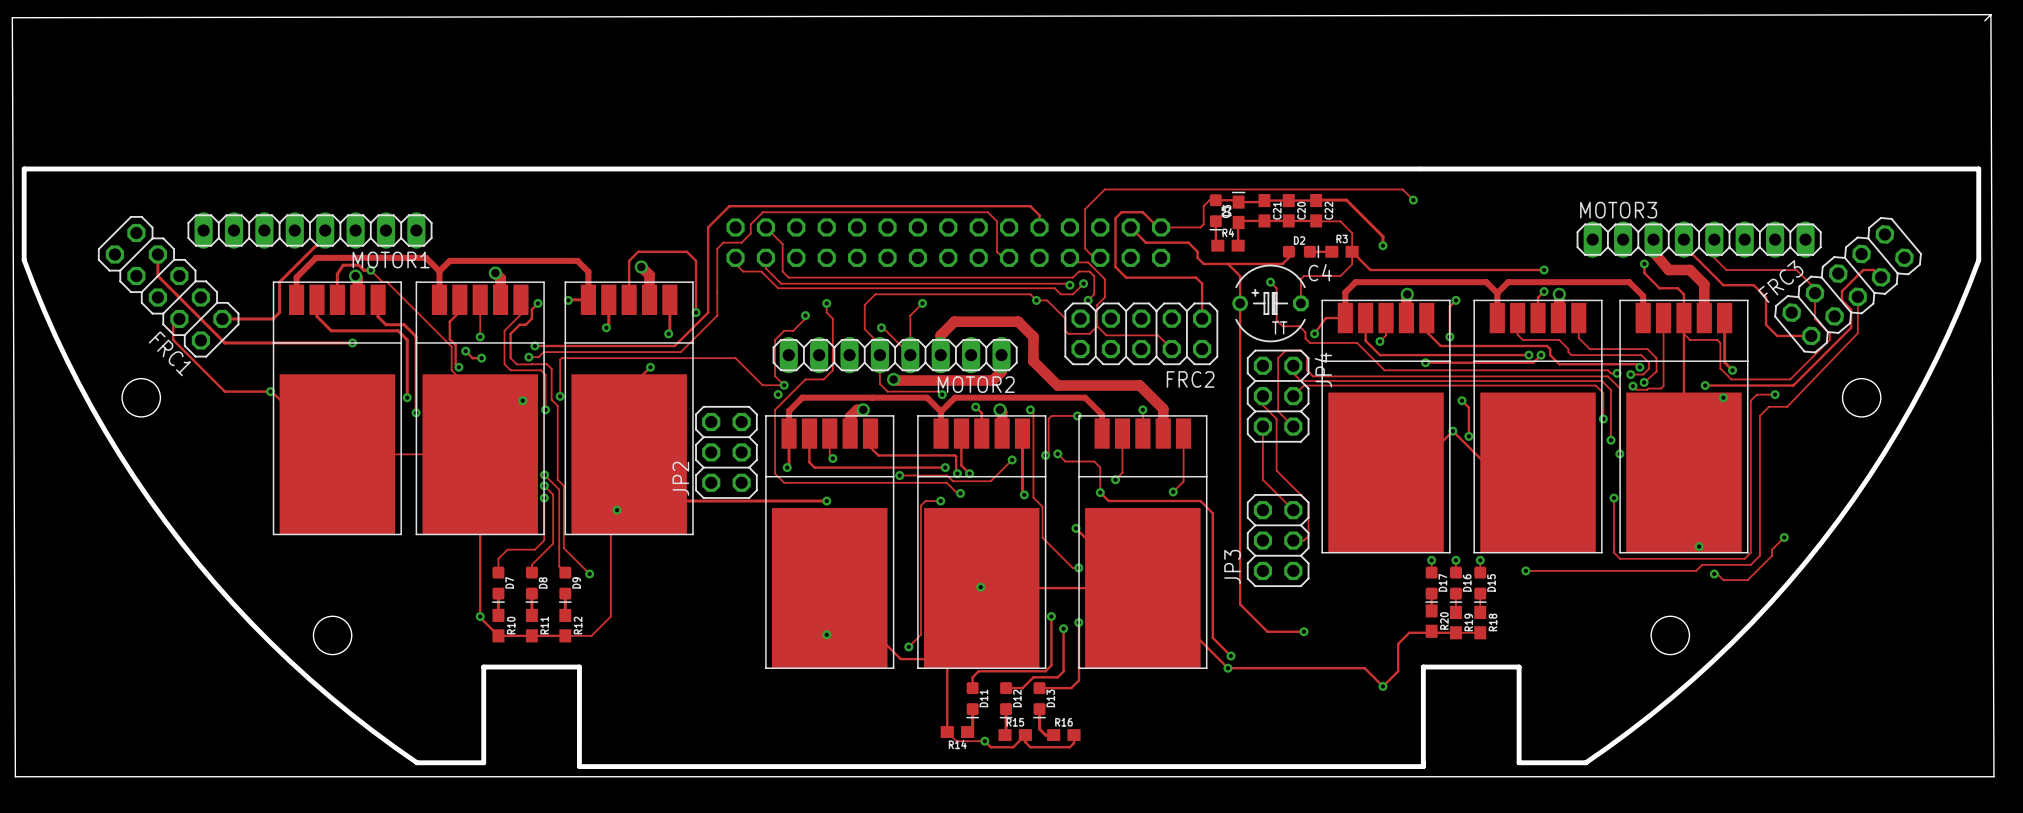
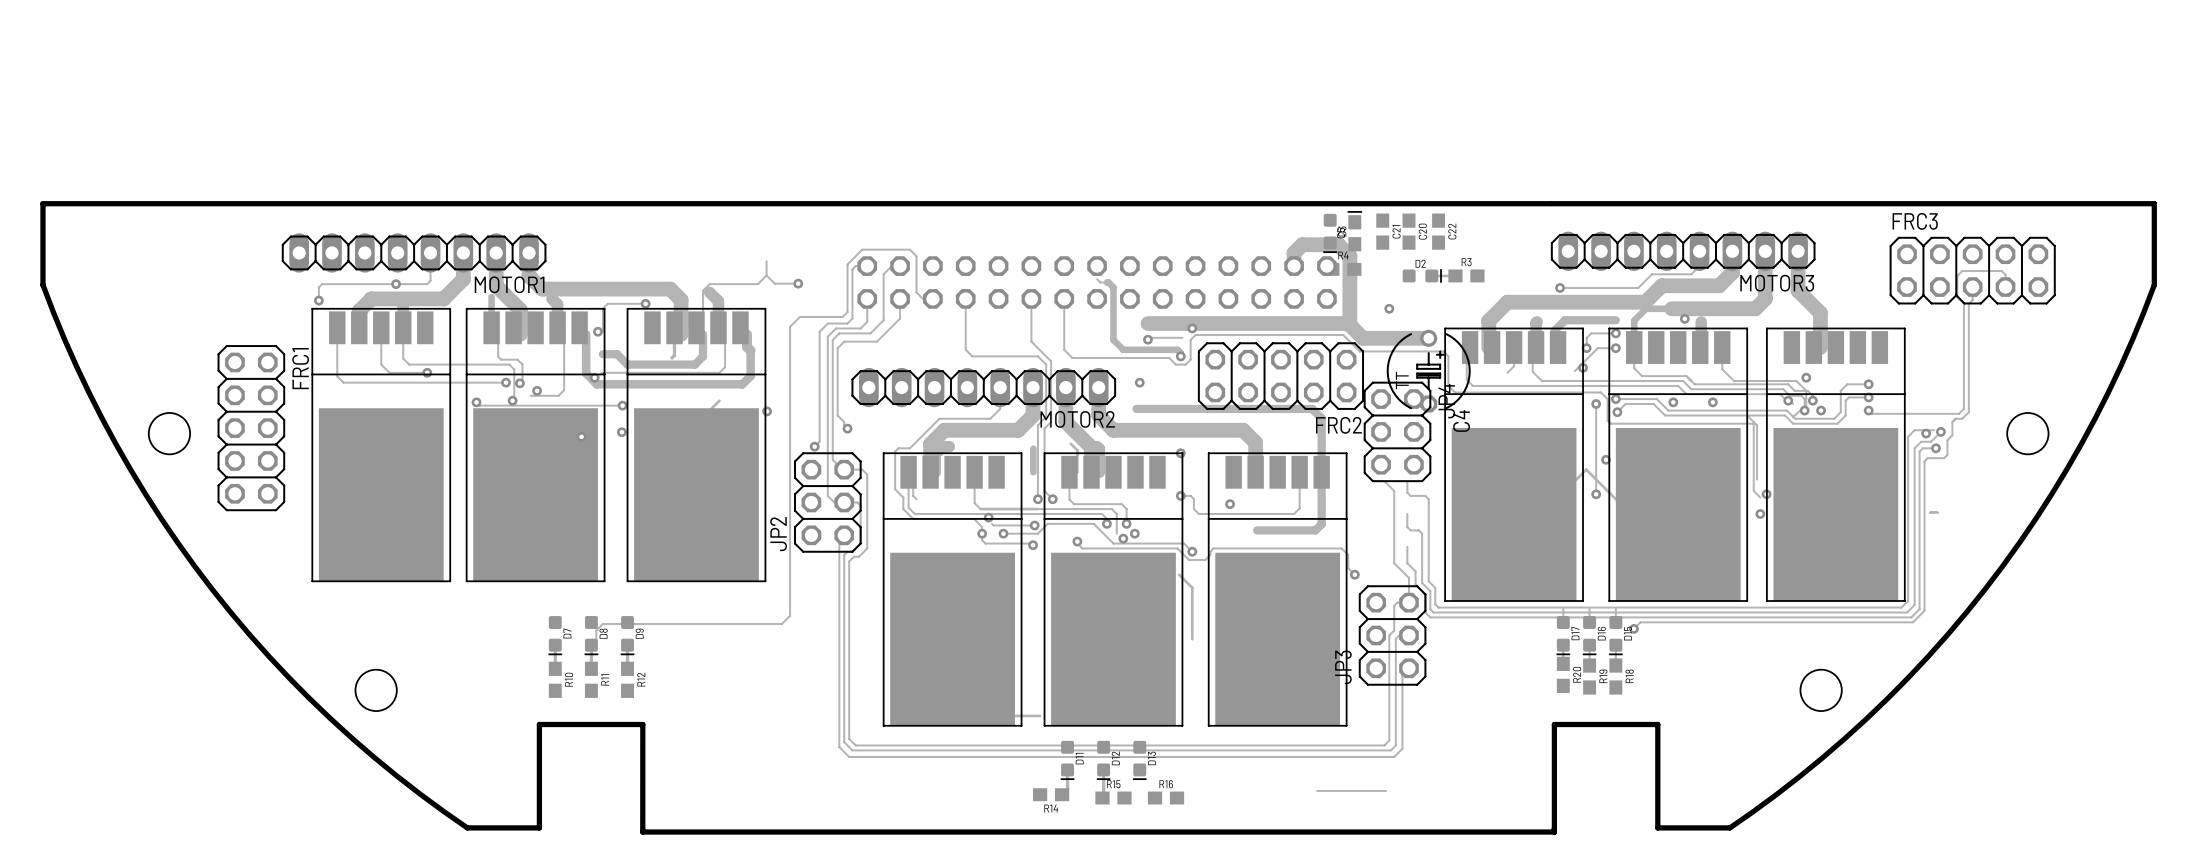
board edge: (1990, 14) (12, 17) (15, 776) (1993, 776) (1990, 14) -> none
board edge: (1990, 14) (1984, 20) -> none
board edge: (1419, 168) (24, 168) (24, 184) -> (1550, 203) (42, 203)
board edge: (1420, 168) (1978, 168) (1978, 184) -> (1551, 203) (2154, 203)
track: (1413, 200) (1402, 189) (1104, 189) (1085, 209) (1085, 248) (1094, 257) (1100, 257) -> none
via: (1413, 200) -> none
MOTOR3 name position: MOTOR3 (1618, 210) -> MOTOR3 (1777, 283)
track: (1215, 221) (1215, 243) (1217, 245) -> none
track: (765, 227) (782, 244) (782, 271) (788, 277) (1072, 277) (1079, 271) (1089, 271) (1094, 276) (1094, 294) (1088, 300) -> none
track: (1039, 227) (1039, 215) (1030, 206) (729, 206) (708, 227) (708, 312) (674, 346) (534, 346) -> none
track: (1130, 227) (1145, 242) (1188, 242) (1197, 251) (1197, 257) (1203, 263) (1282, 263) (1288, 257) (1288, 251) -> none
track: none -> (1699, 251) (1699, 266) (1691, 274) (1651, 274) (1638, 287) (1560, 287)
track: none -> (1732, 251) (1732, 272) (1719, 285) (1661, 285) (1645, 302) (1507, 302) (1488, 320) (1488, 347)
track: none -> (1798, 251) (1798, 290) (1820, 313) (1820, 347)
MOTOR1 position: (309, 230) -> (414, 252)
track: (325, 230) (325, 236) (279, 282) (279, 312) (273, 318) (222, 318) -> none
track: none -> (430, 252) (430, 280) (427, 284) (322, 284) (318, 287) (318, 300)
track: none -> (463, 252) (463, 279) (443, 298) (371, 298) (359, 311) (359, 327)
track: none -> (496, 252) (496, 285) (520, 309) (520, 334)
track: none -> (529, 252) (529, 275) (542, 289) (670, 289) (681, 299) (681, 334)
track: none -> (766, 261) (766, 275)
track: (1653, 239) (1653, 251) (1668, 270) (1690, 270) (1704, 284) (1704, 318) -> none
track: (1683, 239) (1683, 245) (1723, 285) (1753, 285) (1765, 297) (1765, 324) (1777, 335) (1811, 335) -> none
MOTOR3 position: (1699, 239) -> (1683, 251)
track: (1714, 239) (1714, 257) (1726, 270) (1796, 270) (1815, 288) (1815, 319) (1829, 333) (1829, 339) (1790, 379) -> (2005, 287) (2005, 274) (2001, 271) (1962, 271) (1957, 275) (1957, 297) (1963, 303) (1963, 408) (1958, 413) (1950, 413)
track: none -> (867, 266) (855, 266) (852, 269) (852, 318) (847, 323) (827, 323) (819, 331) (819, 441) (814, 446)
track: none -> (900, 266) (891, 266) (883, 274) (883, 320) (870, 333) (839, 333) (832, 339) (832, 459) (842, 469) (862, 469) (867, 474) (867, 548) (859, 556) (854, 556) (849, 561) (849, 738) (855, 745) (1384, 745) (1389, 740) (1389, 635) (1394, 630) (1394, 605) (1397, 602) (1409, 602) (1409, 578) (1394, 563) (1394, 491) (1384, 481) (1374, 481)
part position: (948, 242) -> (1097, 282)
track: none -> (1294, 266) (1294, 252) (1302, 244) (1338, 244) (1349, 256) (1349, 325)
track: (1238, 245) (1238, 222) (1240, 220) (1340, 221) (1352, 233) (1352, 264) (1340, 276) (1303, 276) (1300, 279) (1300, 303) -> none
track: (1382, 245) (1382, 236) (1346, 200) (1262, 202) (1209, 200) (1203, 206) (1203, 224) (1200, 227) (1158, 227) (1142, 212) (1121, 212) (1115, 218) (1115, 266) (1126, 277) (1196, 277) (1202, 283) (1202, 318) -> none
via: (1382, 245) -> none
track: none -> (766, 275) (774, 283) (798, 283)
track: none -> (766, 275) (757, 284) (709, 284) (703, 290) (703, 356) (694, 364) (627, 364) (617, 354) (602, 354)
track: (1352, 251) (1370, 270) (1544, 270) -> none
track: (157, 254) (157, 275) (224, 342) (352, 342) -> none
track: (1000, 254) (996, 251) (996, 221) (987, 212) (762, 212) (750, 224) (750, 233) (741, 242) (723, 242) (717, 248) (717, 315) (680, 352) (671, 352) -> (747, 334) (747, 347) (750, 350) (750, 376) (742, 384)
track: (735, 257) (735, 263) (743, 271) (761, 271) (778, 288) (1054, 288) (1060, 294) (1072, 294) (1083, 283) -> none
track: (765, 257) (765, 268) (781, 283) (1068, 283) (1069, 285) -> none
track: none -> (1106, 282) (1113, 287) (1113, 339) (1123, 349) (1177, 349) (1180, 356)
track: (1069, 257) (1074, 262) (1088, 262) (1104, 279) (1104, 297) (1097, 304) (1097, 326) -> none
via: none -> (798, 283)
via: none -> (1560, 287)
track: (1227, 263) (1240, 276) (1240, 604) (1267, 631) (1303, 631) -> none
track: (1644, 263) (1644, 273) (1659, 288) (1677, 288) (1683, 294) (1683, 449) (1695, 460) -> none
via: (1644, 263) -> none
C4 footprint: [1232, 264, 1309, 343] -> [1386, 329, 1471, 413]
via: (641, 266) -> none
via position: (370, 270) -> (396, 284)
via: (1544, 270) -> none
C4 name position: C4 (1320, 272) -> C4 (1461, 421)
via: (495, 273) -> none
track: none -> (867, 298) (867, 321) (860, 328) (836, 328) (827, 336) (827, 495) (834, 502) (857, 502) (860, 505) (860, 543) (852, 551) (847, 551) (844, 555) (844, 742) (852, 750) (1390, 750) (1395, 745) (1395, 638) (1399, 635) (1409, 635)
track: none -> (900, 298) (900, 318) (877, 341) (844, 341) (837, 348) (837, 415) (847, 428)
track: none -> (932, 298) (923, 298) (916, 292) (916, 256) (909, 249) (862, 249) (847, 264) (847, 312) (842, 316) (799, 316) (790, 326) (790, 615) (781, 623) (602, 623) (596, 630) (596, 646)
track: none -> (965, 298) (965, 349) (972, 356) (1037, 356) (1046, 364) (1046, 416) (1037, 425) (1037, 499)
track: none -> (1031, 298) (1031, 341) (1051, 361) (1051, 422) (1044, 428) (1044, 491) (1052, 499)
via: none -> (318, 300)
via: (355, 276) -> none
track: none -> (645, 303) (607, 303) (602, 308) (602, 332)
track: (1881, 277) (1873, 270) (1863, 270) (1841, 291) (1841, 300) (1851, 309) (1851, 327) (1794, 384) -> (1972, 287) (1972, 299) (1968, 303) (1968, 412) (1962, 418) (1955, 418)
track: (1270, 282) (1276, 288) (1276, 320) (1282, 326) (1299, 326) (1305, 332) (1305, 338) (1310, 342) (1357, 342) (1384, 370) (1489, 370) -> (1617, 412) (1625, 403)
track width: thin (1531, 282) (1609, 282) -> thick (1671, 308) (1755, 308)
track: (1609, 282) (1629, 282) (1643, 296) (1643, 318) -> (1755, 308) (1765, 298) (1765, 251)
via: (1083, 283) -> none
via: (1069, 285) -> none
FRC3 rotation: 0° (1848, 285) -> 40° clockwise (1972, 270)
FRC1 rotation: 0° (168, 286) -> 45° clockwise (251, 428)
FRC1 position: (168, 286) -> (251, 428)
track: (1544, 291) (1538, 297) (1538, 306) -> none
track: none -> (1615, 320) (1564, 320) (1554, 330) (1554, 347)
track: (1497, 293) (1486, 282) (1355, 282) (1345, 292) (1345, 318) (1325, 318) (1314, 333) -> none
via: (1407, 294) -> none
via: (1559, 294) -> none
track: none -> (1147, 323) (1348, 323) (1363, 338) (1428, 338)
track: (1857, 296) (1857, 333) (1787, 406) (1769, 406) (1764, 411) -> (1935, 448) (1922, 448)
track: (296, 299) (296, 277) (316, 257) (426, 257) (439, 271) (449, 260) (577, 260) (588, 271) (588, 299) (568, 300) -> none
track: (337, 299) (337, 274) (343, 265) (358, 265) (363, 270) (370, 270) (382, 281) (386, 281) (451, 346) (451, 370) (460, 379) (480, 379) (480, 448) (486, 454) -> none
track: (459, 299) (458, 312) (449, 321) (449, 339) (455, 345) (455, 363) (458, 367) -> none
track: (480, 299) (480, 336) -> none
track: (520, 299) (520, 314) (504, 330) (504, 364) (510, 370) (541, 370) (545, 374) (545, 409) -> none
track: (629, 299) (629, 260) (638, 251) (686, 251) (696, 260) (696, 312) -> none
track: (669, 299) (668, 333) -> none
via position: (568, 300) -> (645, 303)
via position: (1036, 300) -> (1147, 339)
track: (1455, 300) (1449, 306) (1449, 336) -> none
via: (1455, 300) -> none
track: (537, 303) (531, 309) (531, 318) (525, 324) (519, 324) (510, 333) (510, 358) (516, 364) (531, 364) -> none
track: (826, 303) (826, 312) (832, 318) (832, 370) (823, 379) (805, 379) (775, 409) (775, 473) (784, 482) (904, 482) -> (992, 523) (993, 525)
via: (826, 303) -> none
track: (922, 303) (910, 315) (910, 355) (881, 327) -> none
via: (922, 303) -> none
track: none -> (1615, 333) (1591, 333) (1586, 337) (1586, 348)
via: none -> (1615, 333)
track: none -> (337, 334) (337, 376) (343, 382) (506, 382)
track: (316, 305) (316, 316) (331, 330) (398, 330) (407, 339) (407, 397) -> none
track: none -> (381, 334) (381, 364) (389, 372) (427, 372)
track: none -> (403, 334) (403, 358) (409, 364) (509, 364) (514, 369) (514, 395)
track: (378, 305) (378, 316) (385, 324) (404, 324) (416, 336) (416, 412) -> none
track: none -> (498, 334) (498, 356) (501, 359) (517, 359) (522, 364) (522, 382)
track: none -> (564, 334) (564, 390) (558, 395) (530, 395)
track: none -> (725, 334) (725, 367) (719, 372) (601, 372)
track: none -> (1182, 337) (1149, 337) (1147, 339)
via: (696, 312) -> none
track: (805, 315) (805, 318) (793, 330) (784, 330) (775, 339) (775, 376) (784, 385) (762, 385) (735, 358) (561, 358) (560, 359) (560, 396) -> none
via: (805, 315) -> none
track: (179, 318) (173, 325) (173, 339) (224, 391) (271, 391) (337, 454) (489, 454) (480, 463) (480, 617) (498, 635) (591, 635) (610, 616) (610, 516) (617, 510) (617, 454) (629, 454) (675, 501) (826, 501) -> none
track: none -> (1466, 347) (1466, 379) (1473, 385) (1678, 385) (1686, 394) (1780, 394) (1793, 403)
track: (1365, 318) (1365, 340) (1379, 355) (1528, 355) -> none
track: none -> (1532, 347) (1532, 371) (1541, 381) (1683, 381) (1691, 389) (1783, 389) (1789, 395) (1801, 395) (1804, 399) (1804, 410)
track: (1426, 318) (1426, 332) (1440, 346) (1547, 346) -> (1634, 347) (1634, 368) (1642, 376) (1686, 376) (1688, 377)
via: none -> (1586, 348)
track: none -> (1615, 348) (1597, 348) (1574, 371)
via: none -> (1615, 348)
track: (1517, 318) (1517, 334) (1522, 339) (1559, 339) (1571, 355) (1641, 355) (1648, 362) (1648, 368) (1643, 374) (1630, 374) -> none
track: (1663, 318) (1663, 386) (1661, 388) -> (1868, 397) (1848, 397) (1845, 400) (1845, 415) (1837, 423) (1811, 423)
track: (1683, 318) (1683, 333) (1690, 339) (1717, 339) (1720, 342) (1720, 368) (1731, 379) -> (1868, 410) (1871, 413) (1887, 413)
track: (1724, 318) (1724, 362) (1732, 370) -> none
via: none -> (1180, 356)
track: (1097, 326) (1089, 333) (1082, 333) -> (1760, 497) (1753, 491) (1753, 423) (1610, 423) (1607, 420) (1607, 399) (1601, 392) (1454, 392) (1448, 385) (1448, 356) (1443, 351) (1359, 351) (1343, 335) (1195, 335) (1190, 339) (1190, 359) (1185, 364)
track: (1097, 326) (1106, 335) (1158, 335) (1171, 349) -> none
via: (606, 327) -> none
via: (881, 327) -> none
via: (668, 333) -> none
track: (1072, 333) (1068, 333) (1065, 330) (1065, 318) (1047, 300) (1036, 300) (1030, 294) (875, 294) (864, 304) (864, 329) (879, 344) (879, 384) (887, 391) (939, 391) (942, 394) -> (1175, 364) (1169, 358) (1072, 358) (1064, 349) (1064, 298)
FRC2 position: (1141, 333) -> (1280, 376)
via: (1314, 333) -> none
via position: (480, 336) -> (506, 382)
via: (1379, 341) -> none
via position: (352, 342) -> (427, 372)
via: none -> (1806, 377)
track: (1550, 349) (1550, 355) (1559, 364) (1636, 364) (1639, 367) -> (1691, 381) (1694, 384) (1788, 384) (1794, 390) (1807, 390) (1812, 395) (1812, 400)
via: none -> (1139, 382)
track: (465, 351) (472, 358) (481, 358) -> none
track: (543, 352) (538, 357) (528, 357) -> (604, 384) (597, 384) (586, 373) (586, 334)
track width: thin (543, 352) (671, 352) -> thick (604, 384) (742, 384)
via: none -> (1868, 384)
FRC1 name position: FRC1 (169, 353) -> FRC1 (300, 368)
track: none -> (1000, 387) (1000, 408) (990, 418) (939, 418) (909, 448) (898, 448) (895, 451) (895, 489) (903, 497) (903, 509) (913, 518) (973, 518) (982, 527) (982, 540) (985, 543) (1034, 543)
track: (940, 355) (940, 335) (954, 321) (1018, 321) (1033, 336) (1033, 361) (1057, 385) (1139, 385) (1163, 408) (1163, 433) -> (1033, 387) (1033, 415) (1018, 430) (944, 430) (930, 444) (930, 472)
track: none -> (1065, 387) (1065, 422) (1091, 447) (1091, 472)
via: (1528, 355) -> none
track: (1541, 355) (1533, 362) (1425, 362) -> none
via: (1541, 355) -> none
via: (528, 357) -> none
via: (1425, 362) -> none
track: (532, 364) (547, 364) (551, 368) (551, 399) (557, 405) (557, 479) (563, 485) (563, 548) (589, 573) -> none
via: none -> (1868, 397)
track: (1293, 365) (1293, 373) (1300, 380) (1525, 380) -> none
via: none -> (1615, 399)
via: (650, 367) -> none
via: none -> (1812, 400)
track: none -> (476, 402) (479, 405) (622, 405)
via: none -> (476, 402)
via: none -> (1673, 402)
via: none -> (1712, 402)
track: none -> (1596, 403) (1596, 494)
via: none -> (1596, 403)
track: (1515, 370) (1607, 370) (1610, 373) (1617, 373) -> (1653, 403) (1665, 415)
via: (1732, 370) -> none
via: none -> (622, 405)
track: (1001, 371) (992, 380) (893, 379) -> (1098, 405) (1098, 415) (1113, 430) (1243, 430) (1255, 442) (1255, 472)
via: (1617, 373) -> none
track: none -> (1136, 408) (1312, 408) (1321, 418) (1321, 524) (1315, 530) (1257, 530)
via: (1630, 374) -> none
track: (1528, 376) (1313, 376) (1307, 370) (1307, 356) (1300, 350) (1285, 350) (1278, 358) (1278, 411) (1293, 426) -> (1668, 410) (1656, 399) (1615, 399)
track: (1607, 376) (1619, 388) (1619, 453) -> (1753, 410) (1786, 410) (1795, 418) (1834, 418) (1840, 412) (1840, 390) (1847, 384) (1868, 384)
via: none -> (1804, 410)
via: none -> (1821, 410)
via: none -> (1868, 410)
via: none -> (767, 411)
via: none -> (1617, 412)
via: (893, 379) -> none
via: (1644, 382) -> none
via: (784, 385) -> none
track: (1705, 385) (1793, 385) -> none
via: (1705, 385) -> none
track: (1632, 386) (1636, 389) (1648, 388) -> (1747, 415) (1784, 415) (1793, 423) (1797, 423)
via: (1632, 386) -> none
via: (270, 391) -> none
via: none -> (847, 428)
via: (778, 394) -> none
via: (942, 394) -> none
via: (1775, 394) -> none
track: (1262, 396) (1262, 405) (1276, 418) (1276, 470) (1308, 502) (1308, 535) (1303, 540) (1293, 540) -> none
track: (1293, 396) (1303, 385) (1595, 385) (1603, 393) (1603, 418) -> none
track: none -> (1940, 431) (1931, 441) (1921, 441) (1914, 448) (1914, 604) (1907, 612) (1433, 612) (1430, 609) (1430, 591) (1422, 582) (1422, 533) (1418, 530) (1410, 530) (1407, 527) (1407, 513)
via: none -> (1940, 431)
via: (407, 397) -> none
via: (1723, 397) -> none
via: none -> (1926, 433)
track: (1462, 400) (1468, 407) (1468, 436) -> none
via: (1462, 400) -> none
via: (975, 407) -> none
via: (545, 409) -> none
via: none -> (814, 446)
via: (863, 409) -> none
via: (1000, 409) -> none
track: (1030, 409) (1033, 412) (1033, 497) (1042, 506) (1042, 537) (1072, 567) (1078, 567) -> none
via: (1030, 409) -> none
via: (1142, 409) -> none
via: none -> (1935, 448)
via: (416, 412) -> none
track: (1761, 414) (1759, 415) (1759, 555) (1750, 564) (1702, 564) (1696, 570) (1525, 570) -> (1919, 451) (1919, 609) (1911, 617) (1430, 617) (1425, 612) (1425, 594) (1415, 584) (1415, 571) (1407, 563) (1407, 546)
track: (1077, 415) (1051, 415) (1048, 418) (1048, 452) (1045, 455) -> none
via: (1603, 418) -> none
via: none -> (1606, 459)
track: (1262, 426) (1262, 479) (1293, 510) -> none
via: (1452, 431) -> none
track: (809, 433) (809, 462) (814, 467) (892, 467) -> (974, 472) (974, 503) (980, 509)
track: none -> (908, 472) (908, 507) (914, 513) (1101, 513) (1106, 518) (1106, 523)
track: (870, 433) (870, 447) (878, 455) (954, 455) (957, 473) -> none
track: (961, 433) (961, 465) (969, 473) -> none
track: none -> (1069, 472) (1069, 499) (1074, 504) (1121, 504) (1126, 509) (1126, 523)
track: (1022, 433) (1022, 493) (1024, 494) -> none
track: (1102, 433) (1102, 414) (1085, 397) (955, 397) (941, 411) (927, 397) (802, 397) (789, 411) (789, 465) (787, 467) -> none
track: (1122, 433) (1122, 472) (1115, 479) -> none
track: (1183, 433) (1183, 481) (1173, 491) -> none
track: none -> (1299, 472) (1299, 508) (1294, 513) (1198, 513) (1193, 509) (1193, 499) (1190, 495) (1180, 495)
via: (1468, 436) -> none
via: (1610, 440) -> none
JP2 position: (726, 452) -> (827, 502)
track: (1057, 453) (1065, 461) (1094, 461) (1100, 467) (1100, 492) (1108, 501) (1200, 501) (1212, 513) (1212, 637) (1231, 656) -> none
via: (1057, 453) -> none
via: none -> (1596, 494)
via: (1045, 455) -> none
via: none -> (1180, 495)
via: (832, 458) -> none
via: none -> (1037, 499)
via: none -> (1052, 499)
track: (1012, 459) (990, 481) -> (1192, 551) (1184, 543) (1113, 543) (1093, 523) (1087, 523)
via: (1012, 459) -> none
via: (787, 467) -> none
track: none -> (1037, 509) (1111, 509) (1116, 513) (1116, 533)
via: (945, 467) -> none
track: none -> (1937, 511) (1929, 512) (1938, 512)
via: none -> (1760, 513)
via: (957, 473) -> none
via: (969, 473) -> none
track: (544, 474) (559, 489) (559, 566) (565, 572) -> none
via: (544, 474) -> none
track: (899, 475) (947, 475) (954, 481) -> (1003, 533) (1037, 533) (1047, 523)
via position: (1115, 479) -> (1230, 504)
via: none -> (1106, 523)
via: none -> (1126, 523)
track: (942, 482) (946, 482) (957, 493) (960, 493) -> none
via: none -> (1034, 525)
track: (544, 485) (553, 494) (553, 543) (531, 564) (531, 572) -> none
via: (544, 485) -> none
via: none -> (982, 533)
via: none -> (1003, 533)
via: none -> (1134, 533)
track: none -> (844, 535) (839, 540) (839, 747) (849, 756) (1394, 756) (1402, 748) (1402, 674) (1409, 668)
via: (1173, 491) -> none
via: (1100, 492) -> none
via: (960, 493) -> none
track: (544, 497) (544, 540) (534, 549) (507, 549) (498, 558) (498, 572) -> none
via: (544, 497) -> none
track: none -> (1077, 541) (1082, 548) (1177, 548) (1189, 559) (1205, 559) (1213, 548) (1341, 548) (1348, 555) (1348, 568) (1354, 574)
via: none -> (1077, 541)
track: (1614, 498) (1614, 552) (1620, 558) -> (1407, 481) (1407, 492) (1410, 495) (1425, 495) (1428, 499) (1428, 581) (1435, 587) (1435, 604) (1438, 607) (1766, 607)
via: (1614, 498) -> none
via: (826, 501) -> none
track: (940, 501) (925, 501) (920, 505) (920, 634) (908, 646) -> none
via: none -> (1192, 551)
via: (617, 510) -> none
via: (1075, 528) -> none
via: none -> (1354, 574)
track: (1784, 537) (1772, 549) (1772, 555) (1765, 561) -> (1954, 420) (1952, 435) (1947, 440) (1947, 454) (1944, 458) (1927, 458) (1924, 461) (1924, 610)
via: (1784, 537) -> none
JP3 position: (1278, 540) -> (1392, 635)
part position: (829, 542) -> (952, 589)
part position: (981, 542) -> (1113, 589)
part position: (1142, 542) -> (1277, 589)
via: (1699, 546) -> none
via: (1431, 560) -> none
via: (1455, 560) -> none
via: (1480, 560) -> none
via: (1078, 567) -> none
via: (1525, 570) -> none
track: (1755, 572) (1747, 580) (1723, 580) (1717, 573) (1714, 573) -> (1913, 622) (1640, 622) (1633, 628)
via: (589, 573) -> none
via: (1714, 573) -> none
via: none -> (1633, 628)
via: (980, 587) -> none
track: (981, 588) (1147, 588) (1227, 668) (1364, 668) (1382, 686) (1398, 671) (1398, 643) (1409, 632) (1480, 632) -> none
track: (981, 588) (947, 622) (947, 732) (956, 741) (984, 741) (990, 747) (1013, 747) (1025, 735) (1025, 742) (1030, 747) (1069, 747) (1074, 743) (1074, 735) -> none
via: (480, 616) -> none
track: (1051, 616) (1051, 665) (1045, 671) (978, 671) (972, 677) (972, 688) -> none
via: (1051, 616) -> none
track: (1078, 622) (1079, 680) (1071, 688) (1039, 688) -> none
via: (1078, 622) -> none
track: (1063, 628) (1063, 671) (1057, 677) (1033, 677) (1022, 688) (1006, 688) -> none
via: (1063, 628) -> none
via: (1303, 631) -> none
via: (826, 634) -> none
via: (908, 646) -> none
via: (1231, 656) -> none
via: (1227, 668) -> none
via: (1382, 686) -> none
track: (1039, 709) (1039, 729) (1045, 735) (1053, 735) -> none
track: none -> (1317, 790) (1386, 790)
via: (984, 741) -> none

